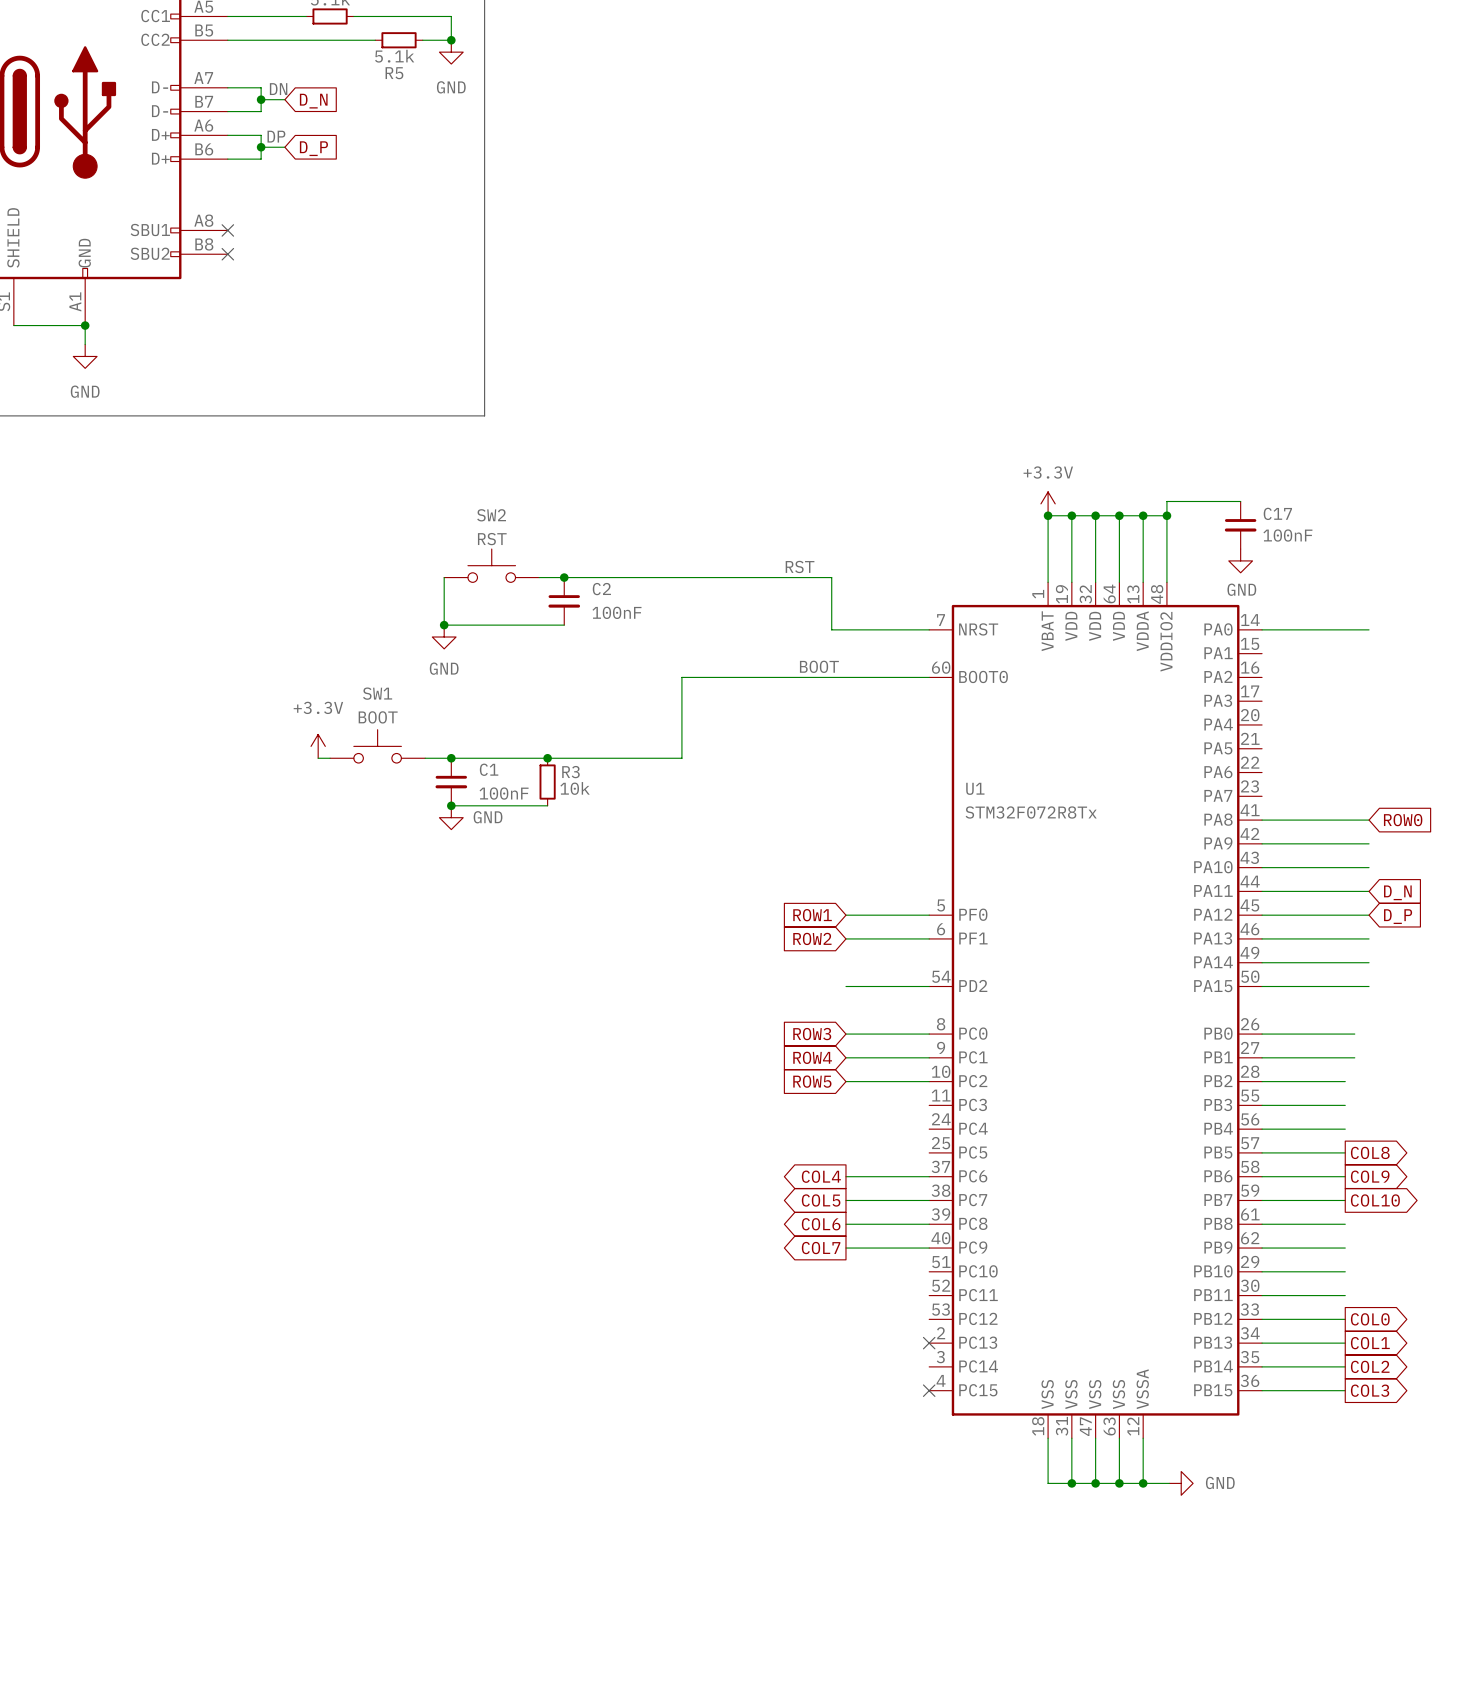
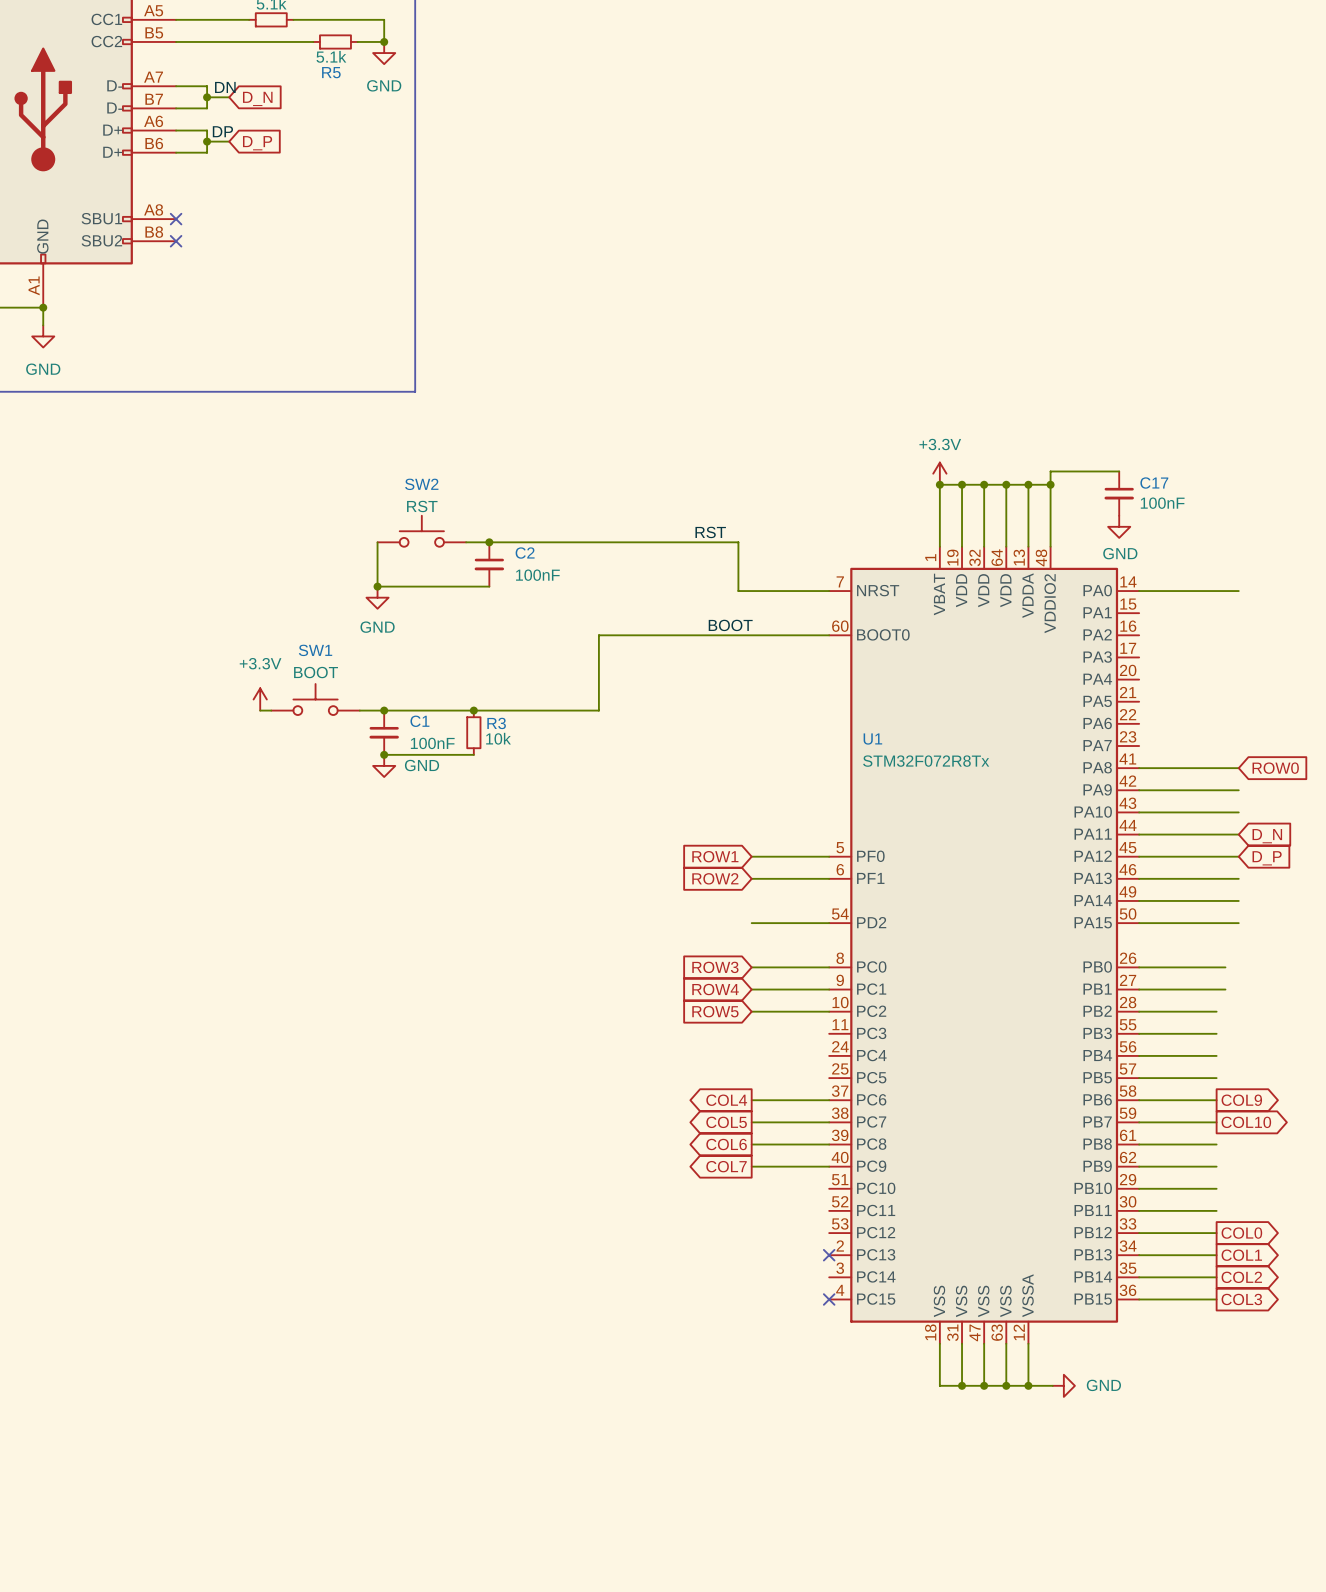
global label: COL8 (1370, 1152) -> none

